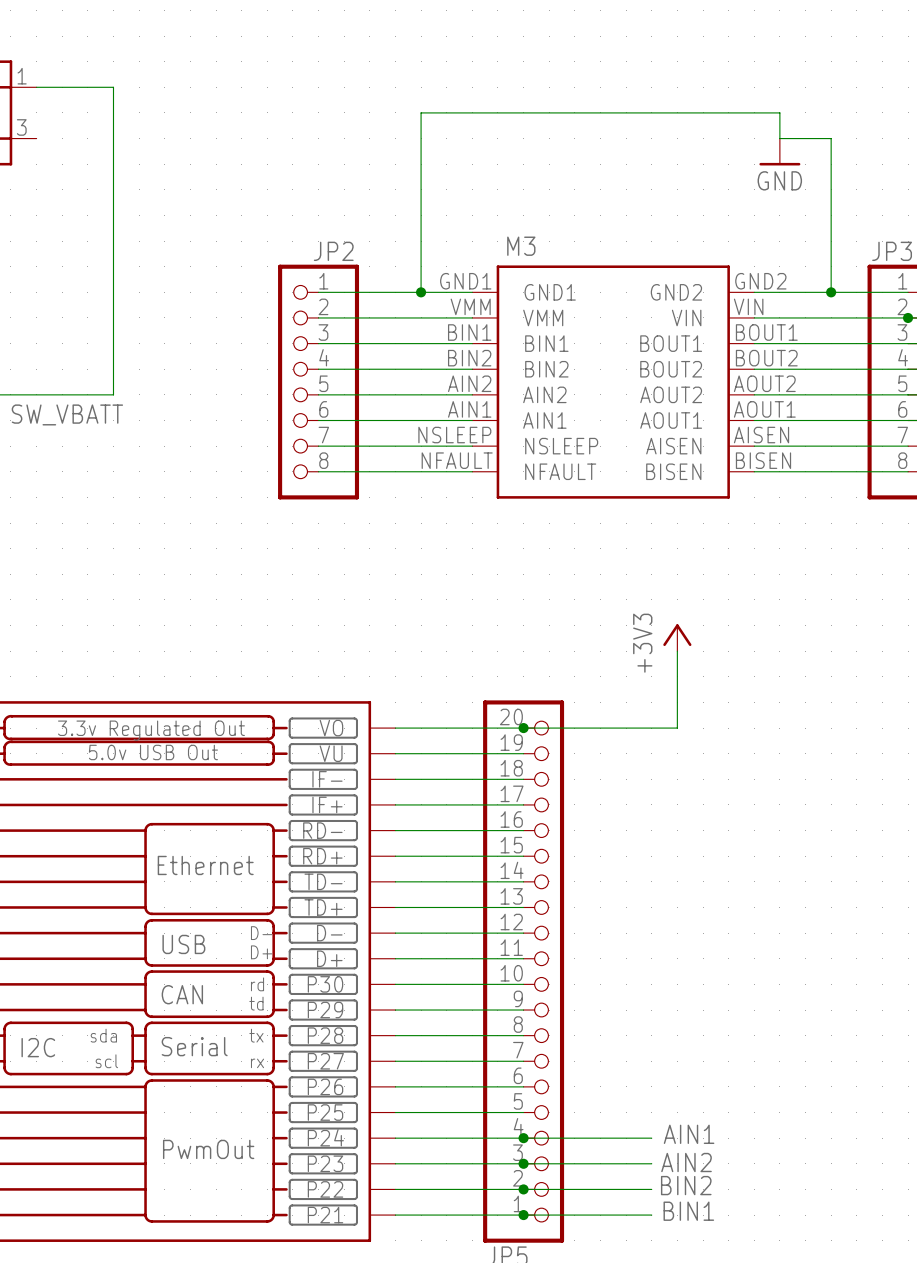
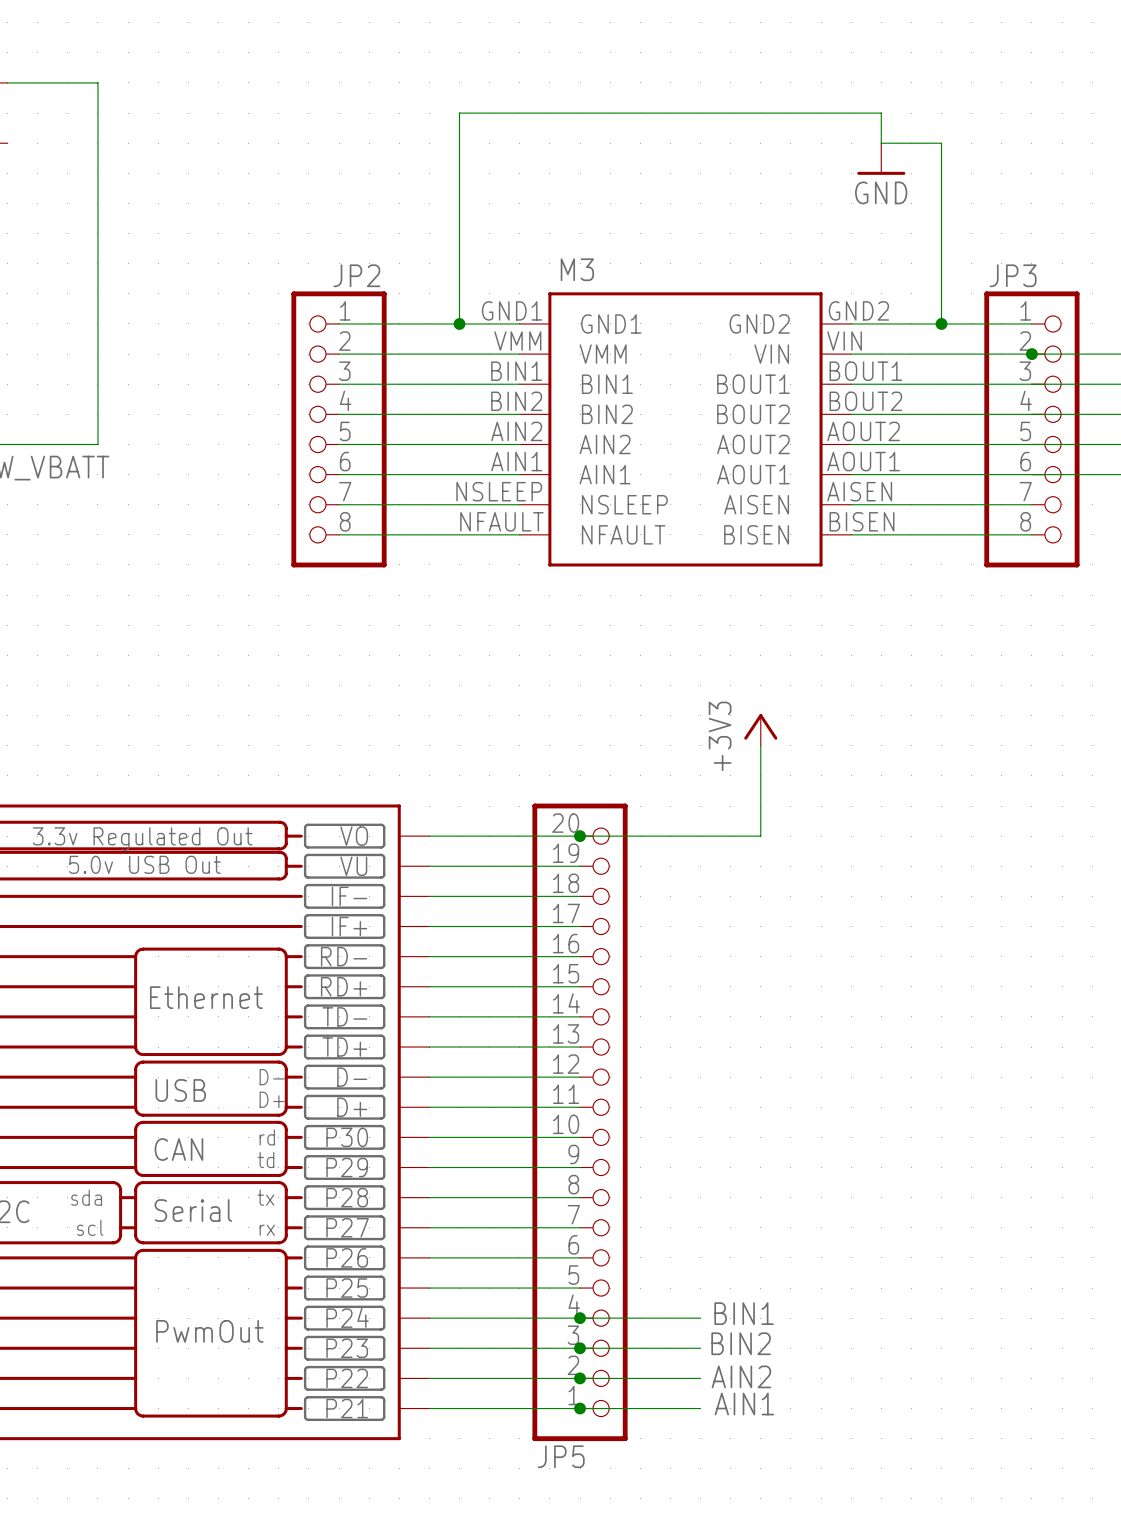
label position: AIN1 (689, 1134) -> AIN1 (744, 1404)
wire: (626, 1138) (651, 1138) -> none
label position: AIN2 (686, 1162) -> AIN2 (741, 1376)
wire: (626, 1163) (651, 1163) -> none
label position: BIN2 (686, 1185) -> BIN2 (741, 1343)
wire: (626, 1189) (651, 1189) -> none
label position: BIN1 (688, 1211) -> BIN1 (744, 1313)
wire: (626, 1215) (651, 1215) -> none

